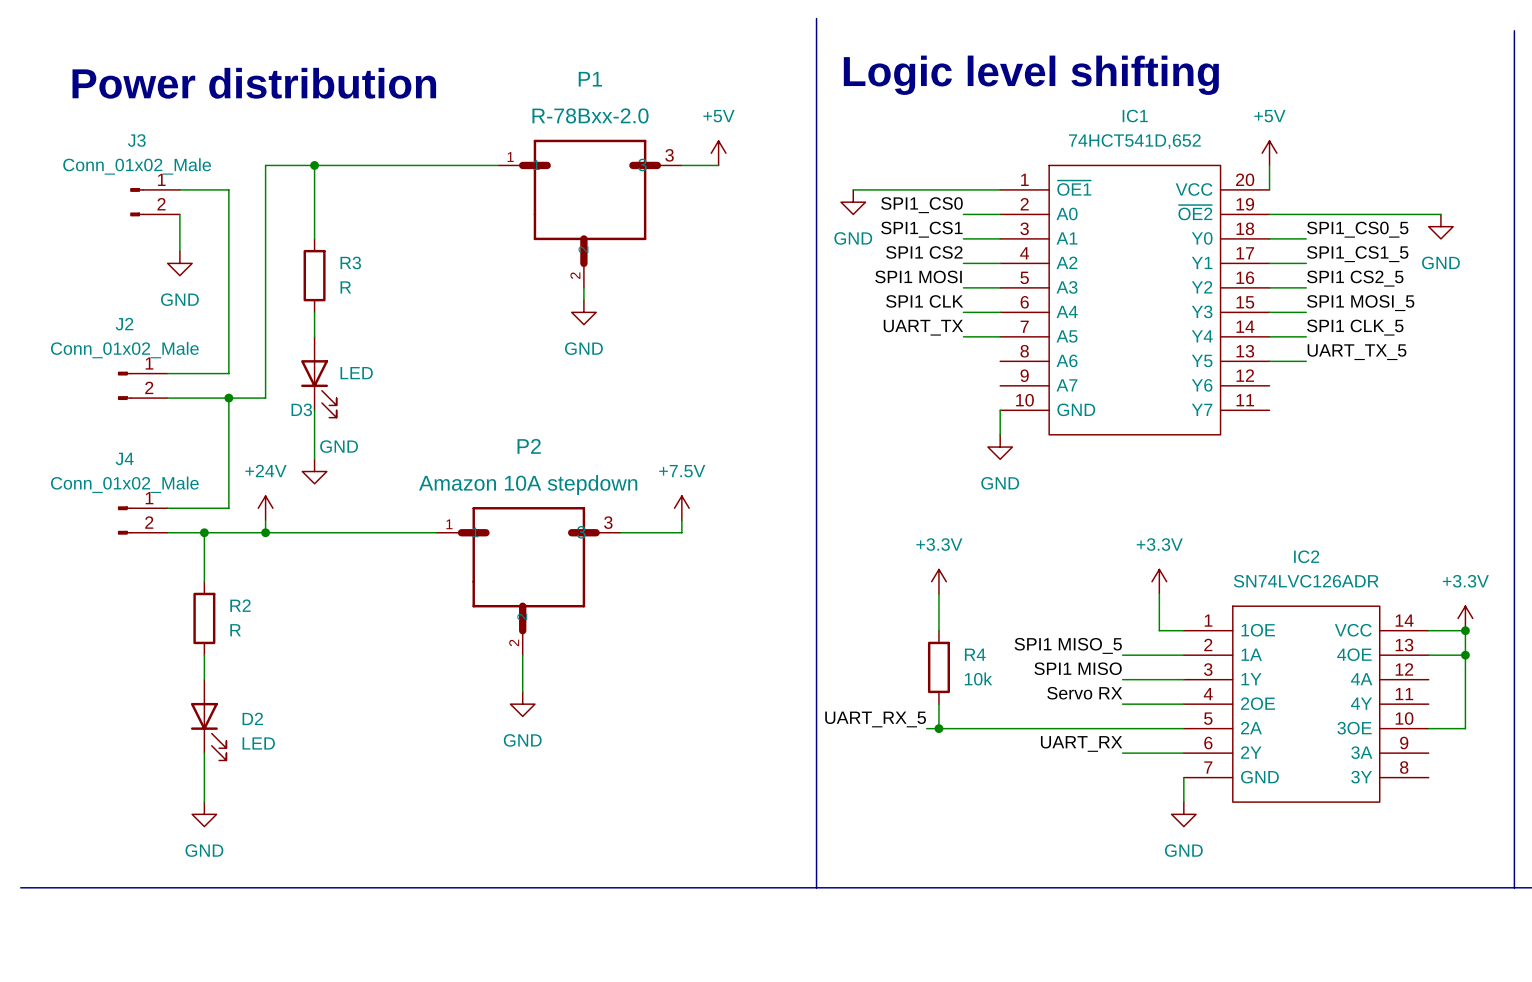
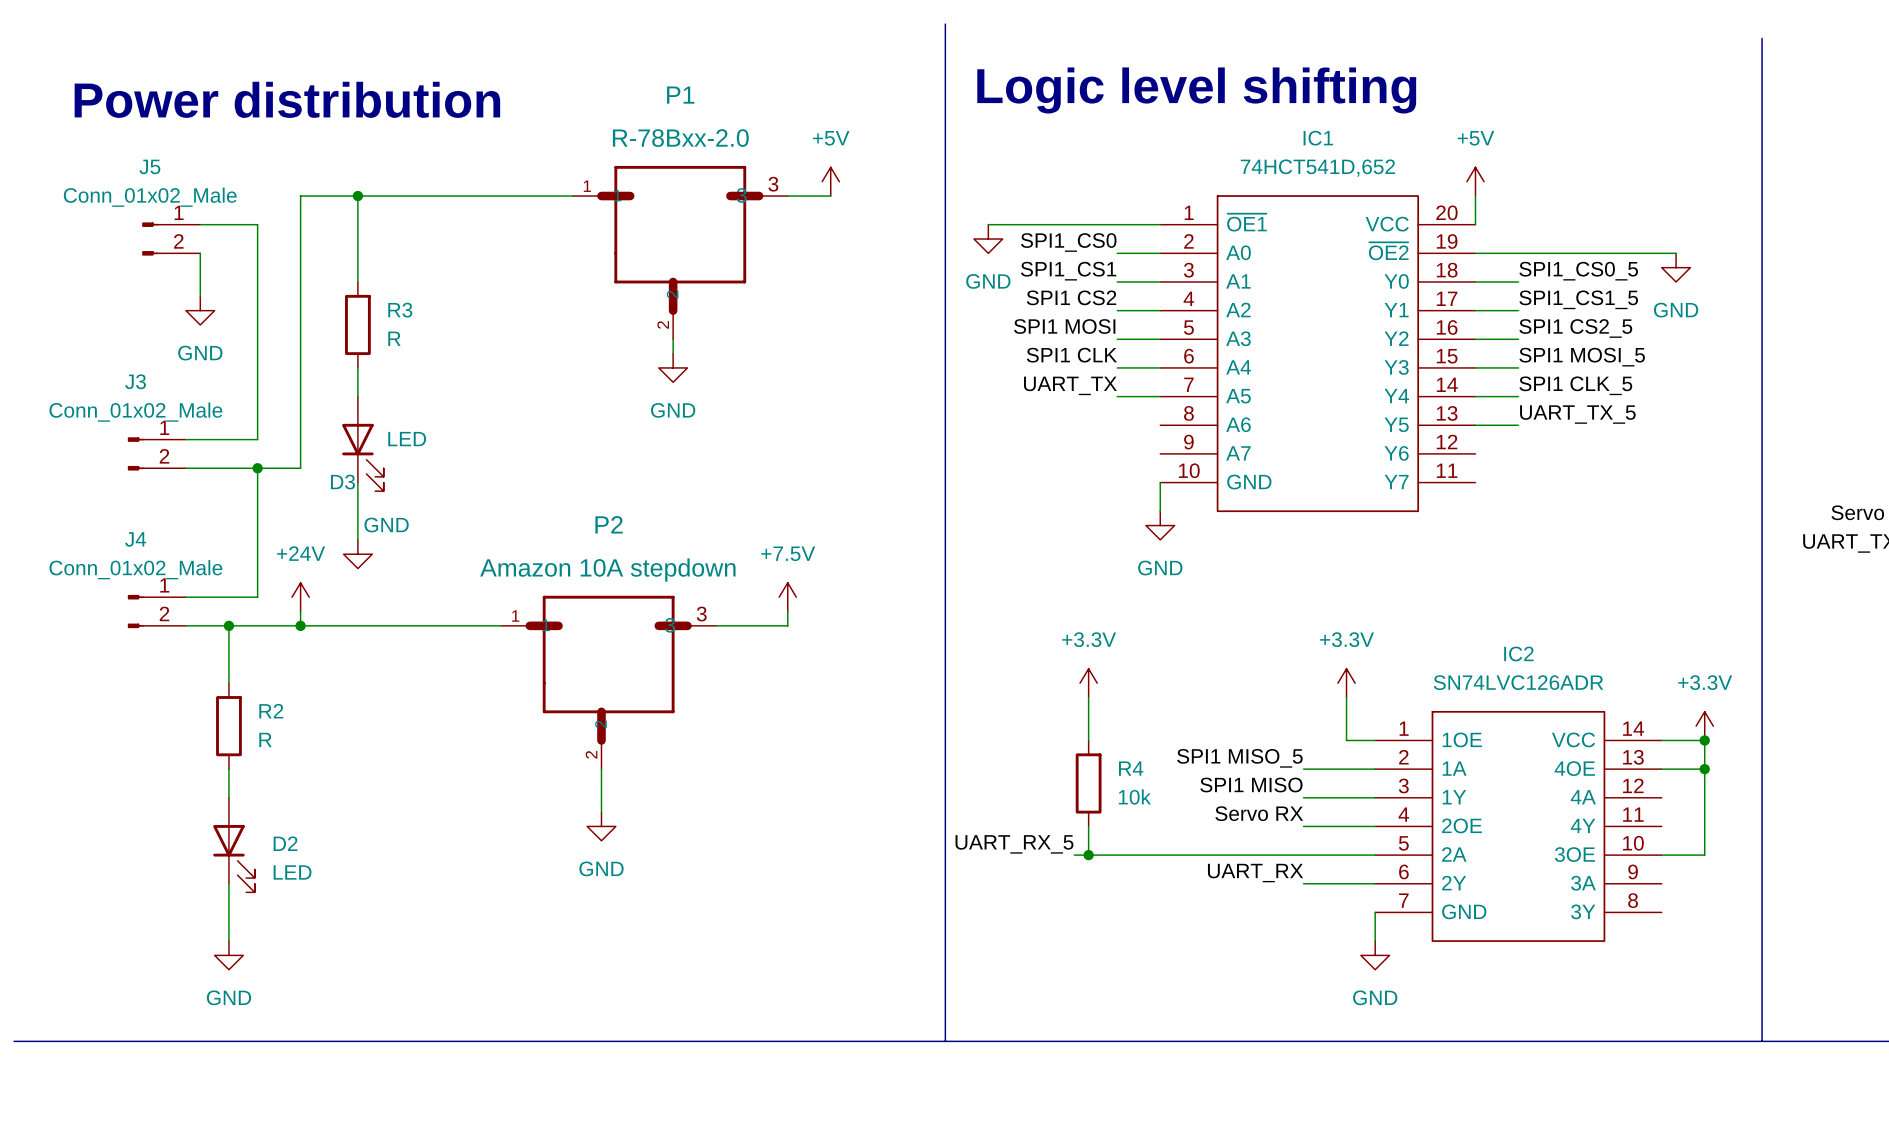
J3 name: J3 (136, 140) -> J5 (149, 166)
J2 name: J2 (124, 324) -> J3 (135, 381)

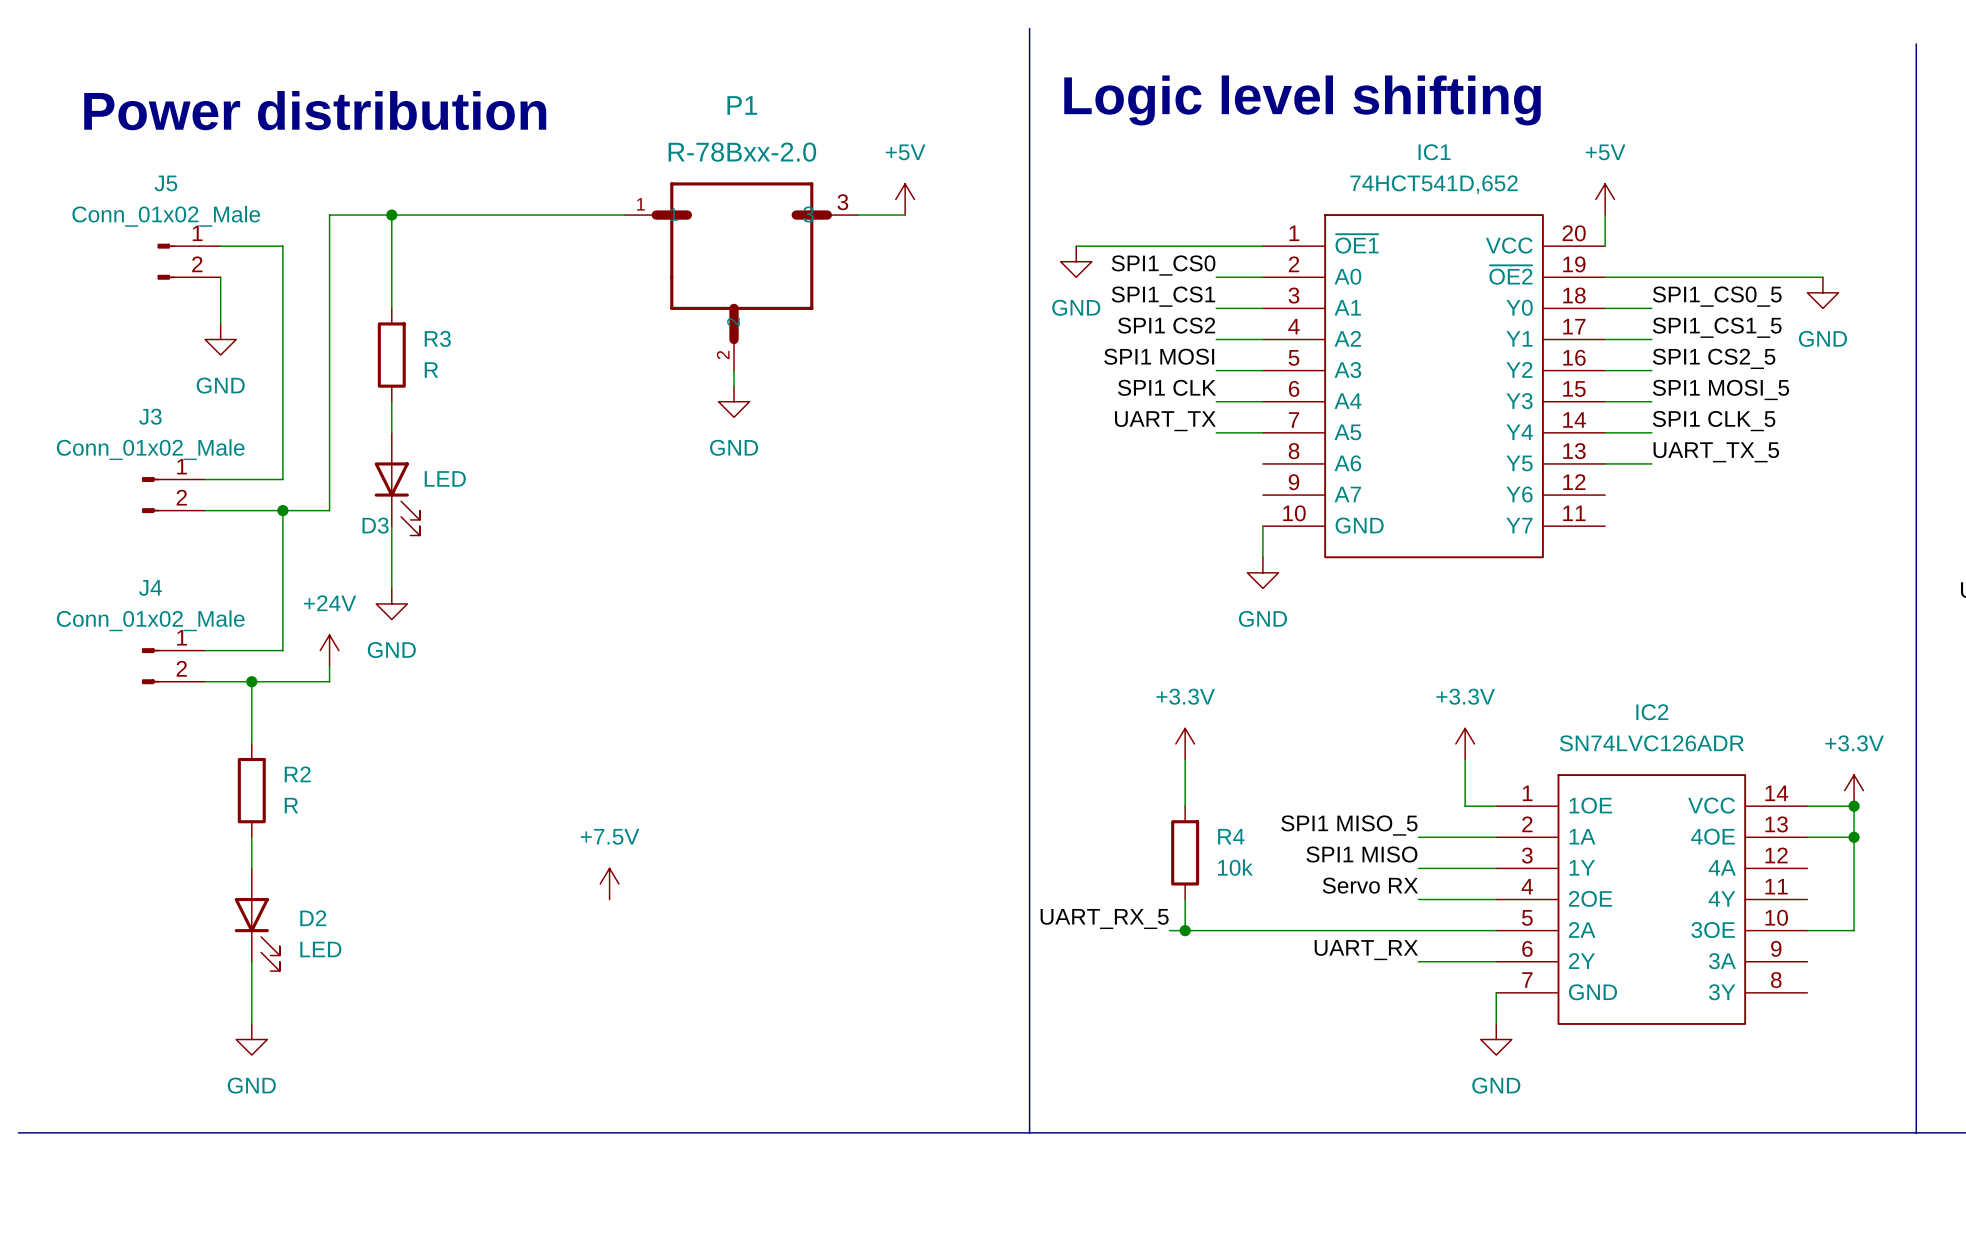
power symbol text position: GND (386, 525) -> GND (391, 650)
power symbol: +7.5V (787, 597) -> none
wire: (787, 611) (787, 625) (716, 625) -> none
wire: (300, 625) (501, 625) -> none
junction: (300, 625) -> none
P2: Amazon 10A stepdown (608, 682) -> none
wire: (601, 769) (601, 812) -> none
power symbol: none -> +7.5V (609, 883)
power symbol: GND (601, 826) -> none

